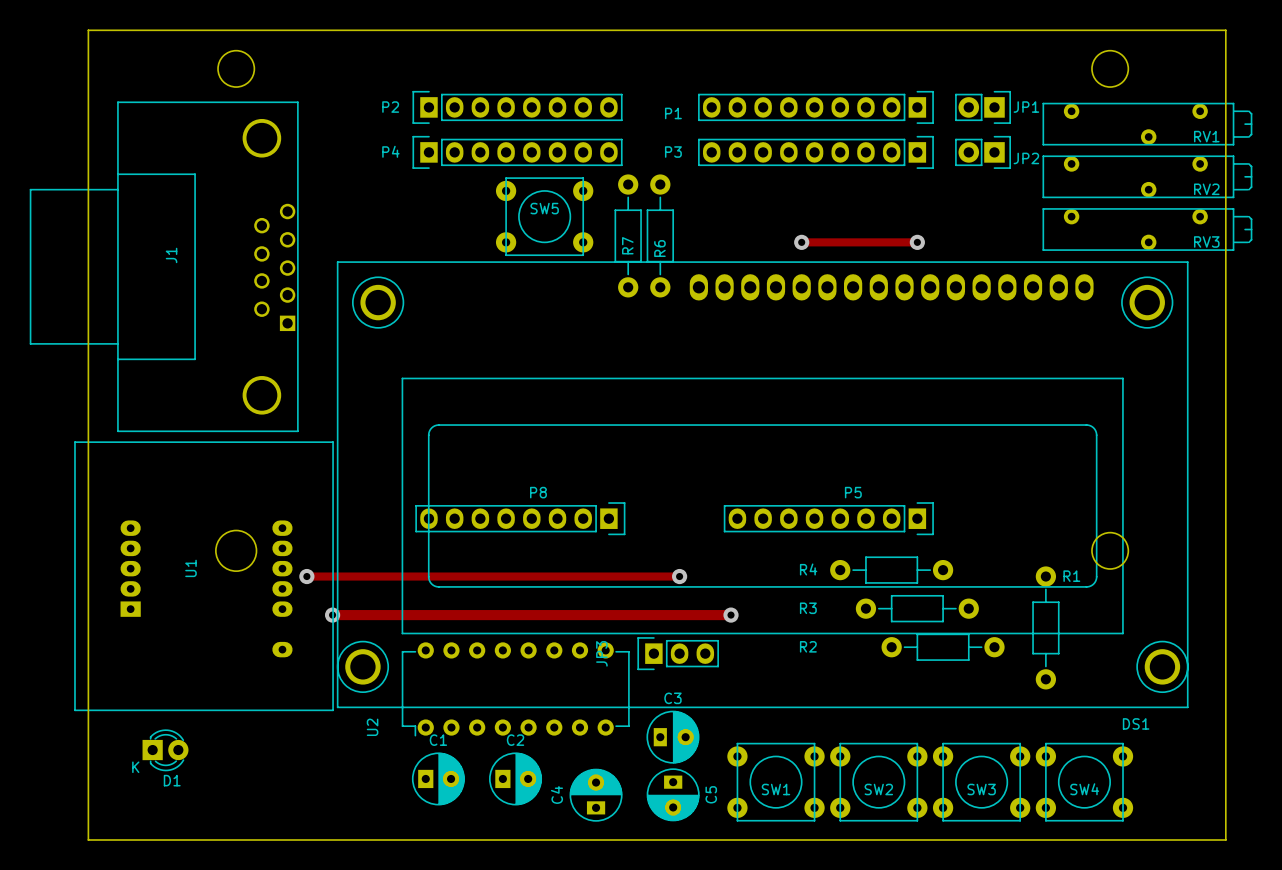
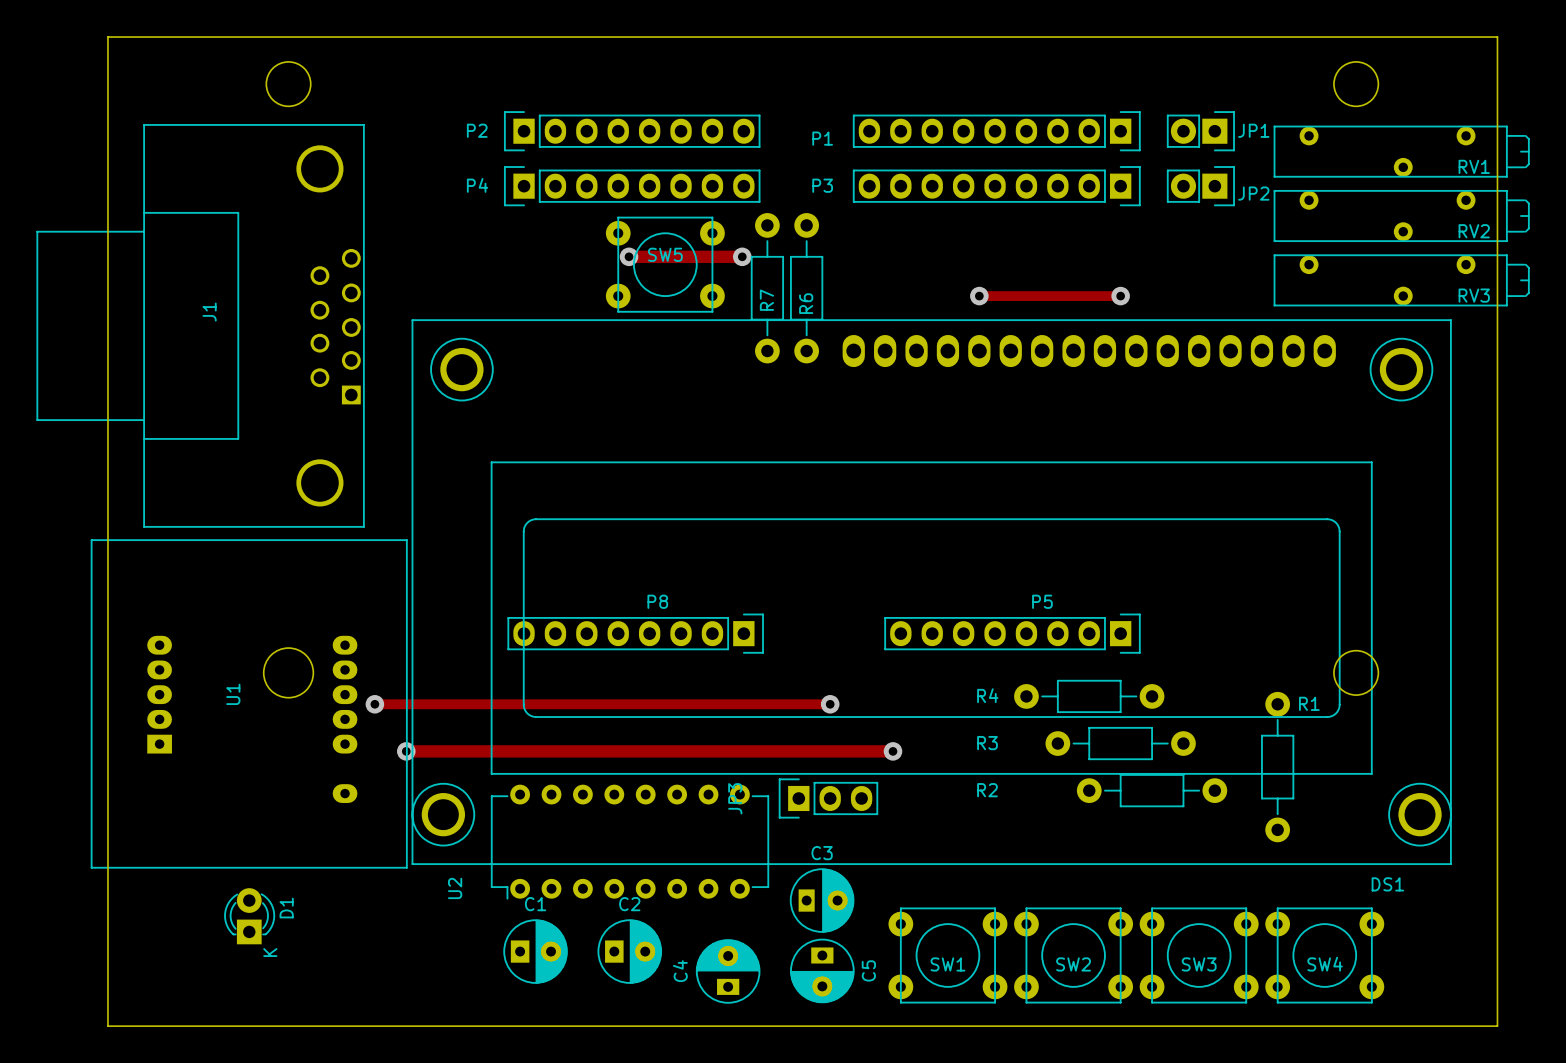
track: none -> (629, 256) (742, 256)
via: none -> (629, 256)
via: none -> (742, 256)
D1 rotation: 0° (165, 750) -> 90° counterclockwise (249, 916)
D1 position: (165, 750) -> (249, 916)

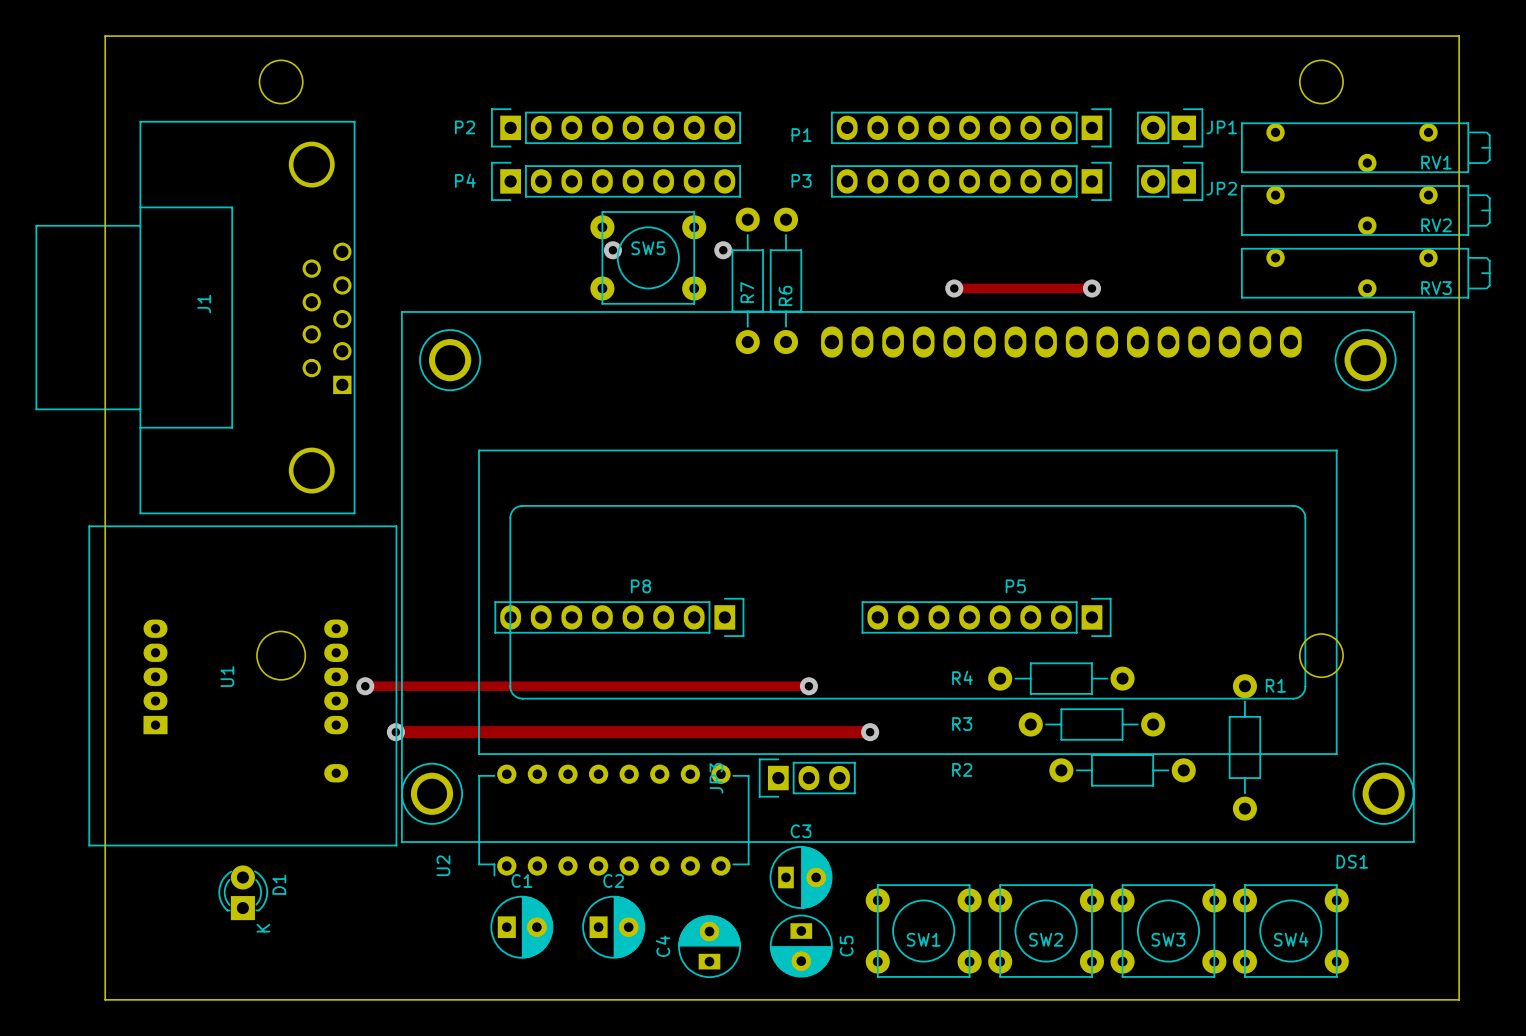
track: (629, 256) (742, 256) -> none

